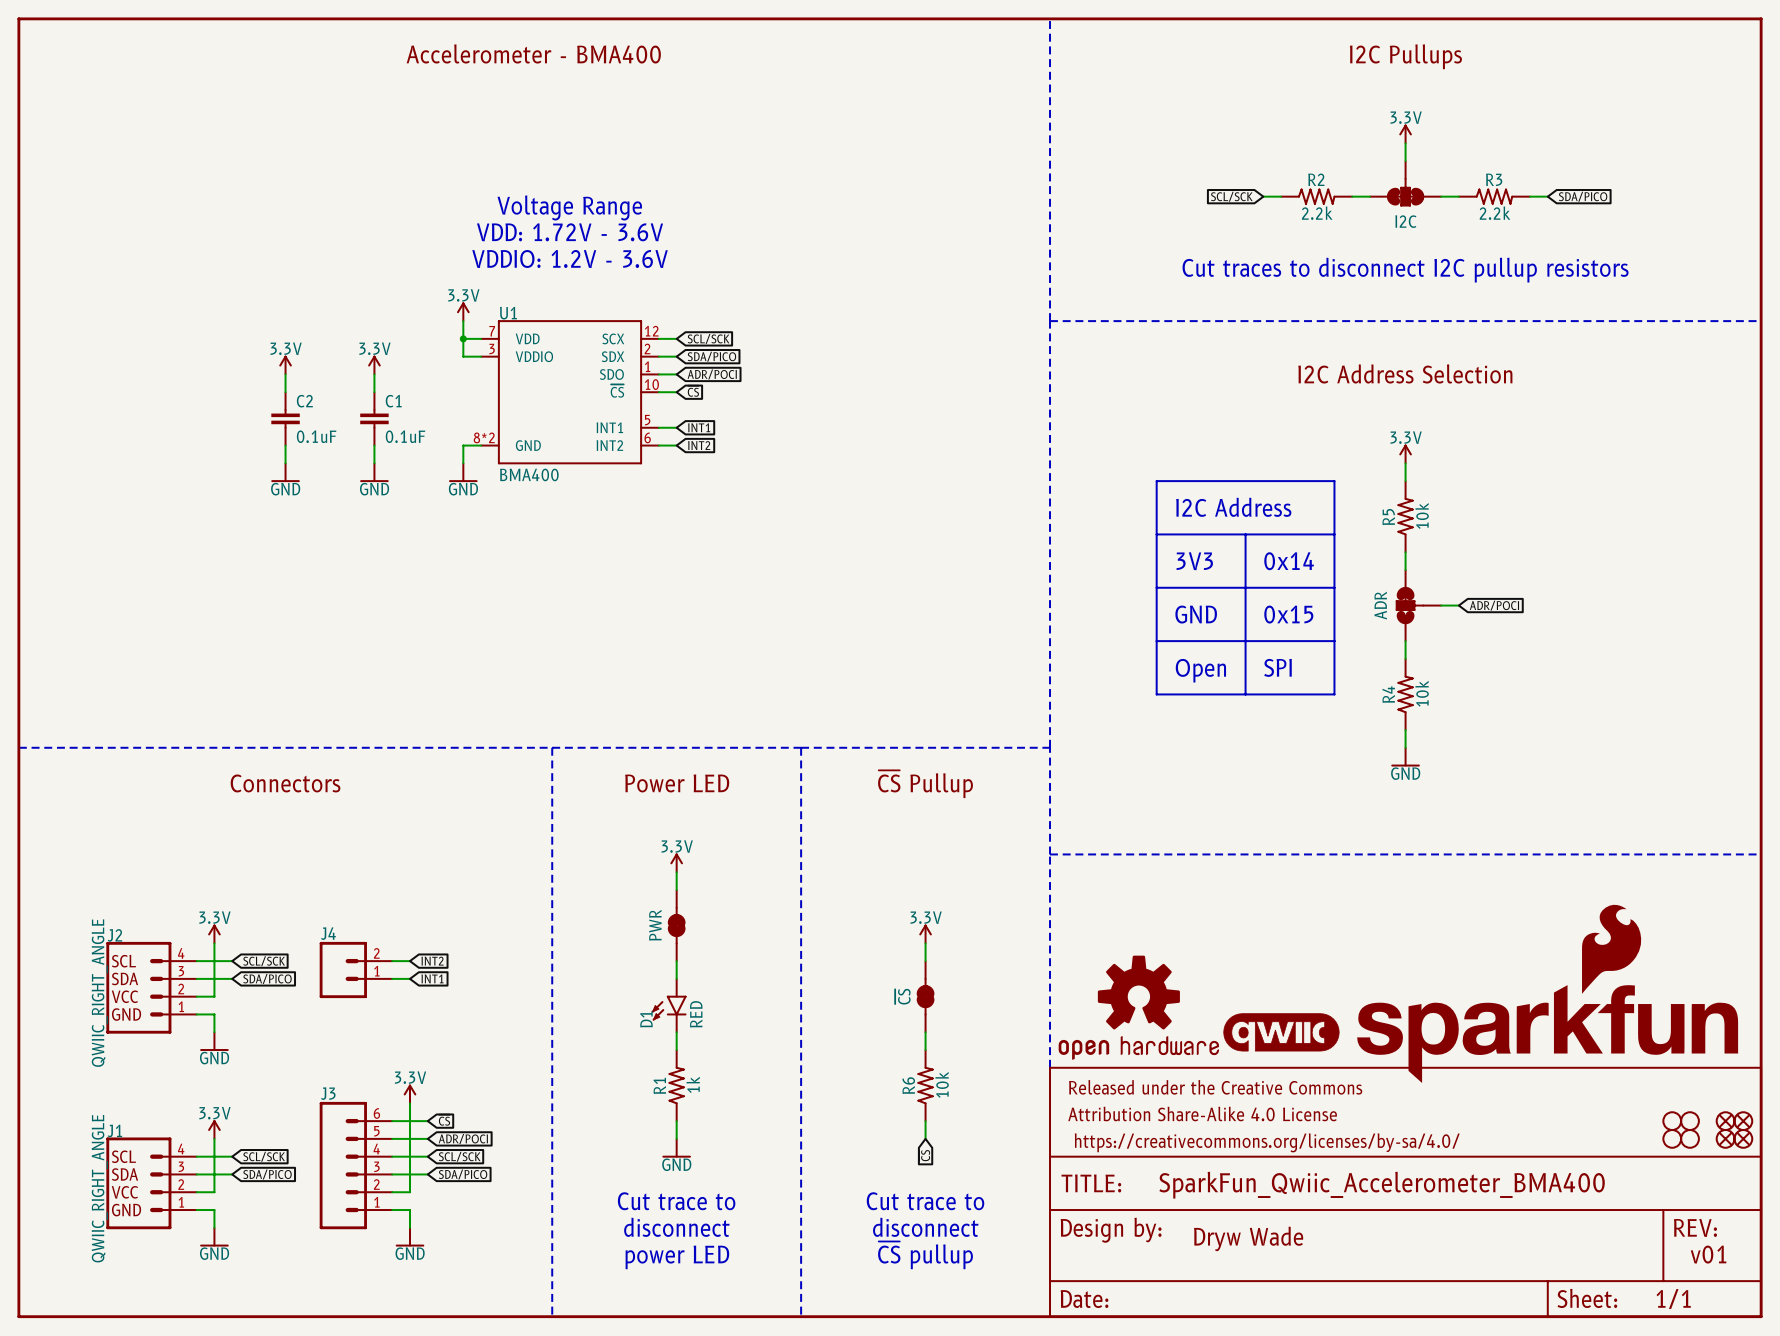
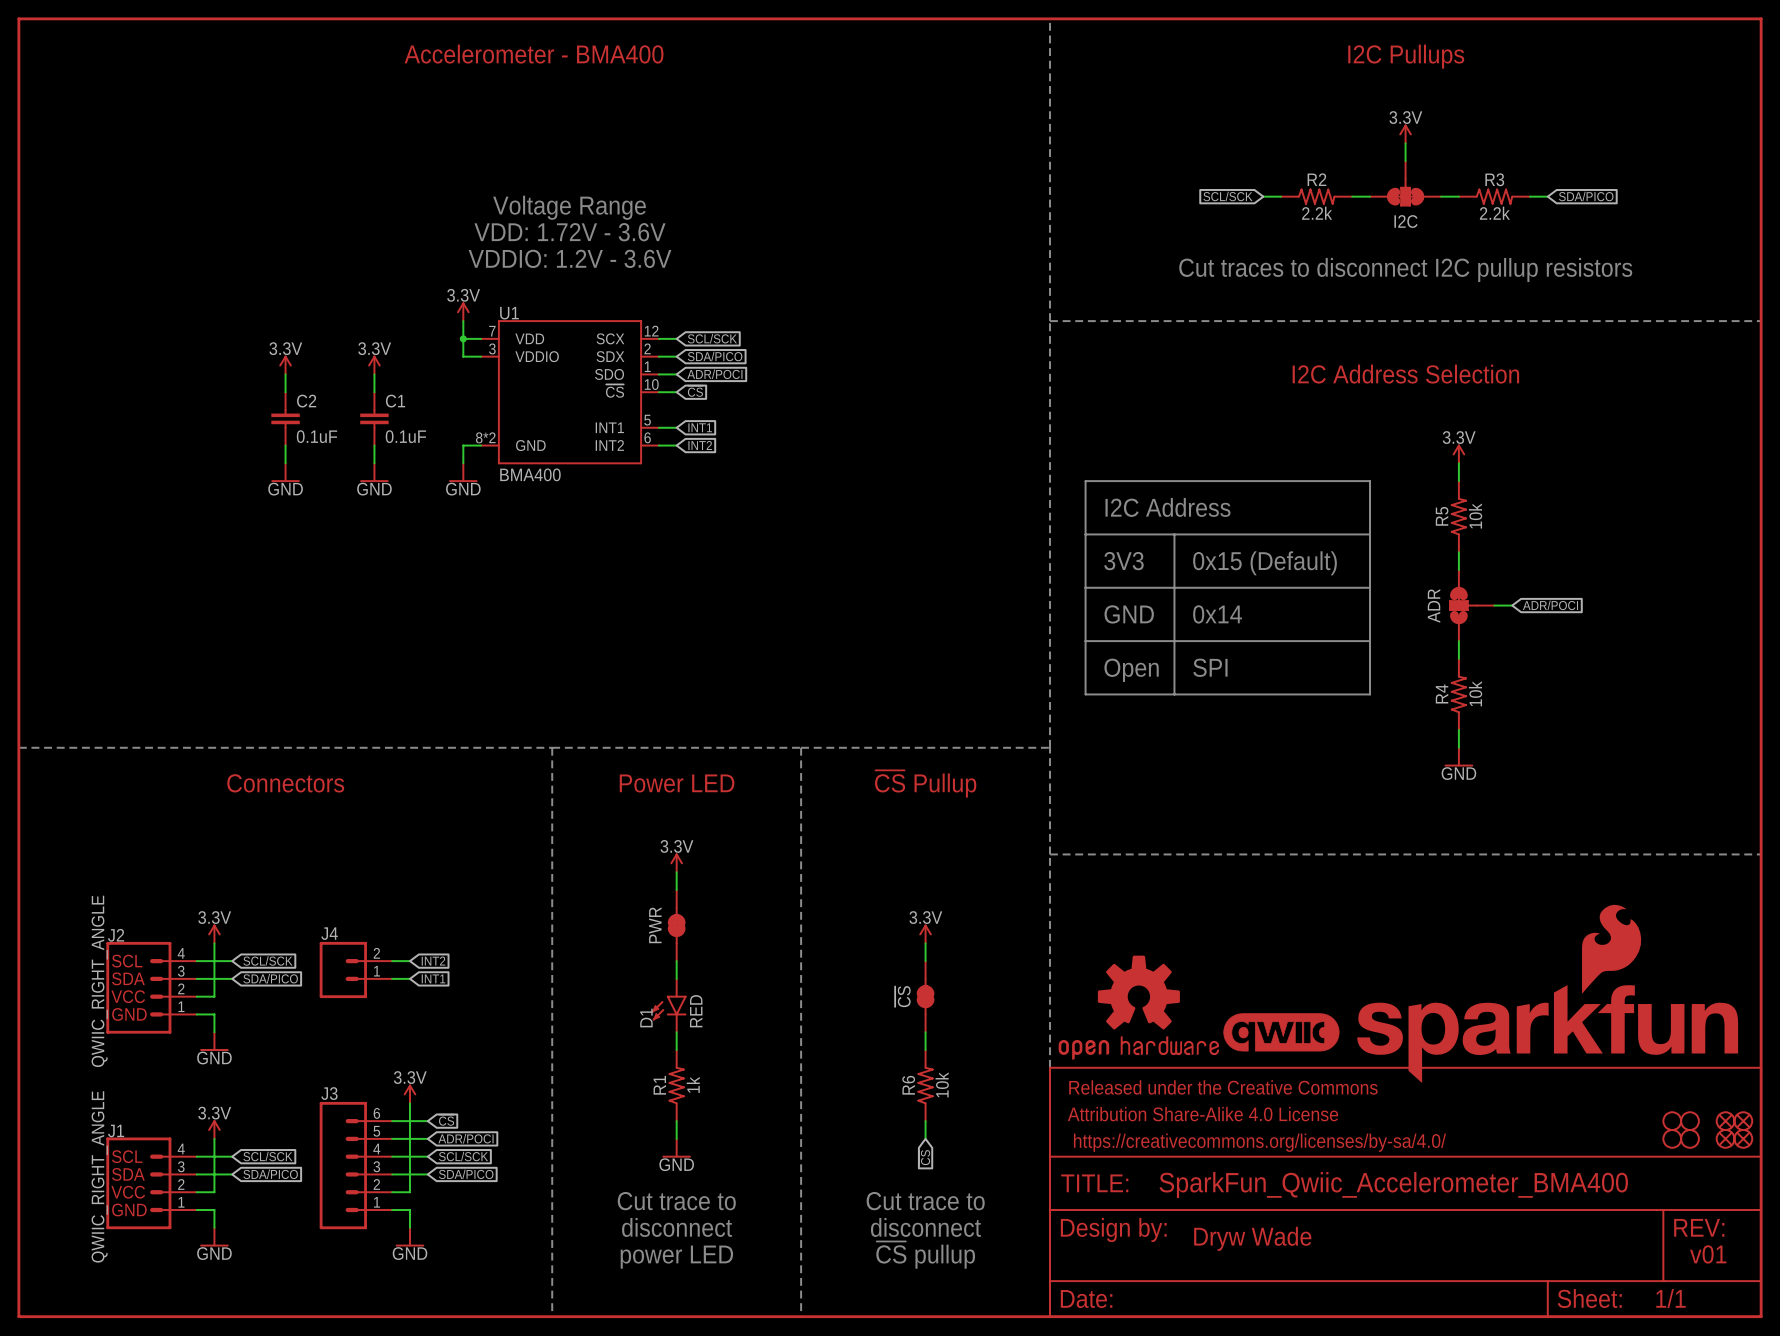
power symbol position: 3.3V (1405, 453) -> 3.3V (1458, 453)
wire: (1405, 463) (1405, 481) -> (1458, 463) (1458, 481)
line: (1156, 481) (1156, 694) -> (1156, 481) (1085, 481) (1085, 694) (1156, 694)
line: (1334, 481) (1334, 694) -> (1334, 481) (1370, 481) (1370, 694) (1334, 694)
text position: I2C Address (1233, 507) -> I2C Address (1167, 507)
R5 position: (1405, 516) -> (1458, 516)
line: none -> (1085, 534) (1156, 534)
line: (1245, 534) (1245, 694) -> (1174, 534) (1174, 694)
line: none -> (1334, 534) (1370, 534)
wire: (1405, 552) (1405, 569) -> (1458, 552) (1458, 569)
text position: 3V3 (1194, 561) -> 3V3 (1123, 561)
text position: 0x14 (1289, 561) -> 0x14 (1217, 614)
text: none -> 0x15 (Default) (1265, 563)
line: none -> (1085, 587) (1156, 587)
line: none -> (1334, 587) (1370, 587)
ADR position: (1418, 605) -> (1471, 605)
global label position: ADR/POCI (1494, 605) -> ADR/POCI (1550, 605)
text position: GND (1196, 614) -> GND (1129, 614)
text: 0x15 (1288, 614) -> none
line: none -> (1085, 641) (1156, 641)
line: none -> (1334, 641) (1370, 641)
wire: (1405, 641) (1405, 658) -> (1458, 641) (1458, 658)
text position: SPI (1277, 667) -> SPI (1210, 667)
text position: Open (1200, 670) -> Open (1131, 670)
R4 position: (1405, 694) -> (1458, 694)
wire: (1405, 730) (1405, 747) -> (1458, 730) (1458, 747)
power symbol position: GND (1405, 757) -> GND (1458, 757)

